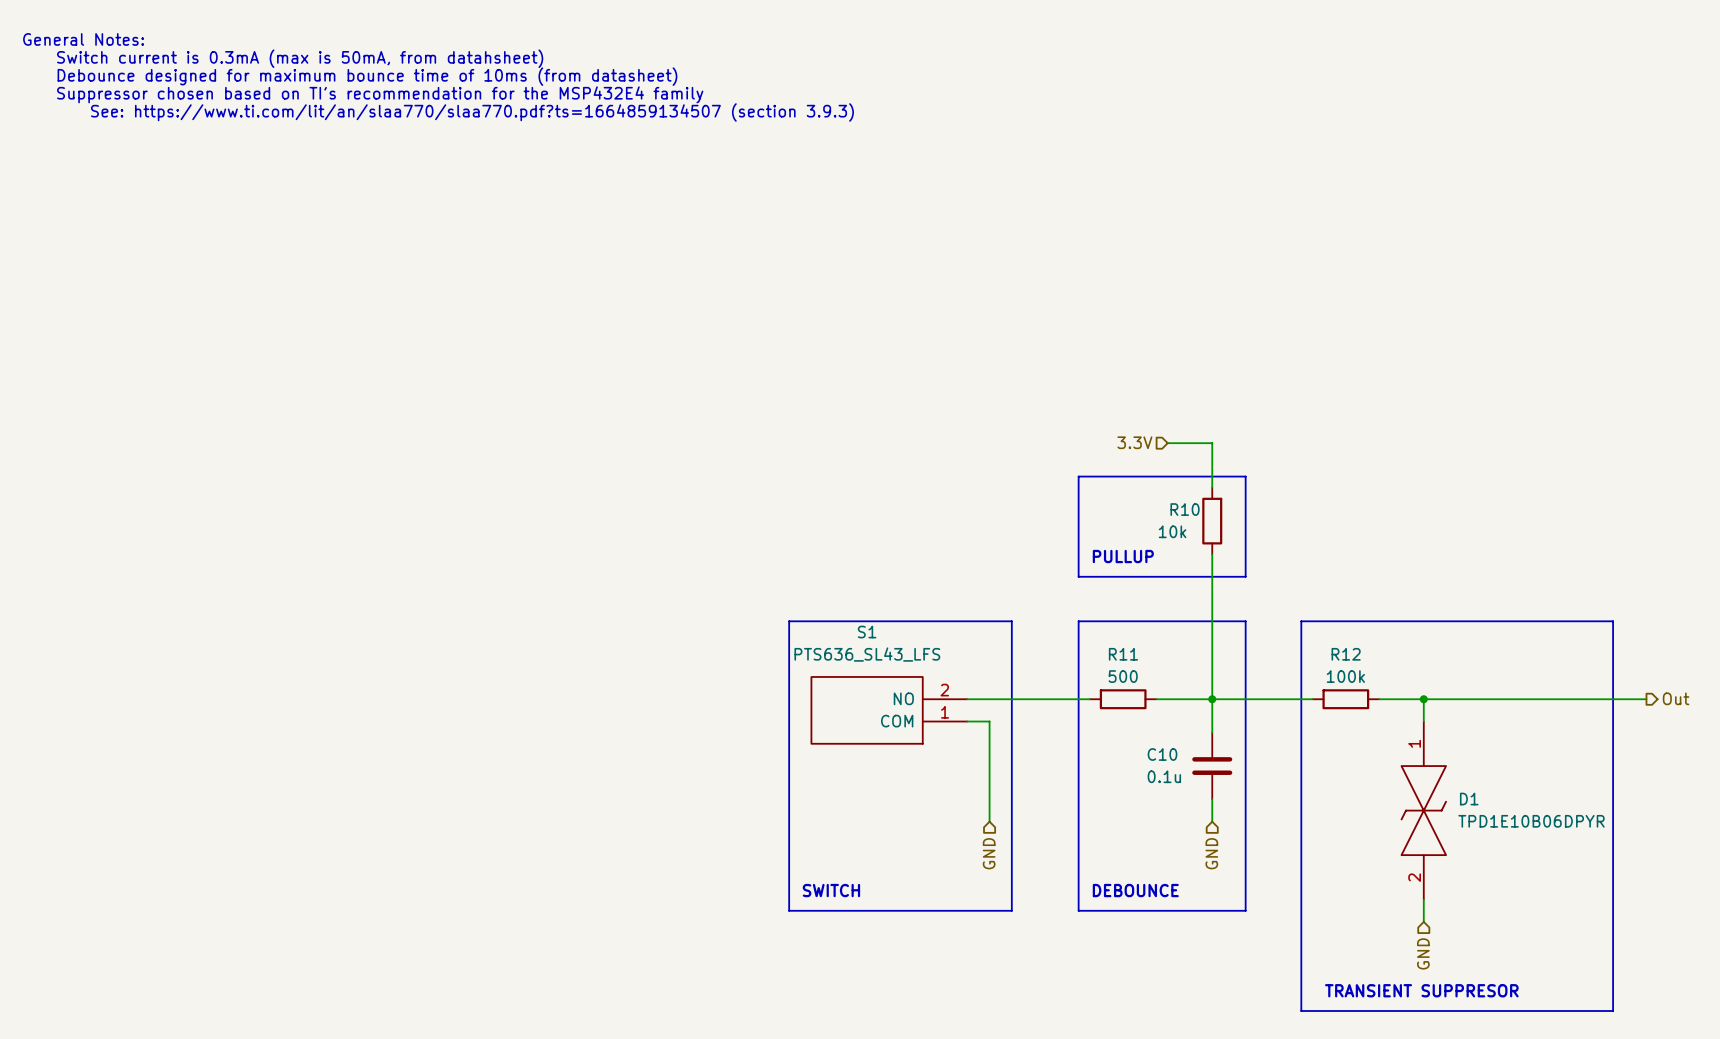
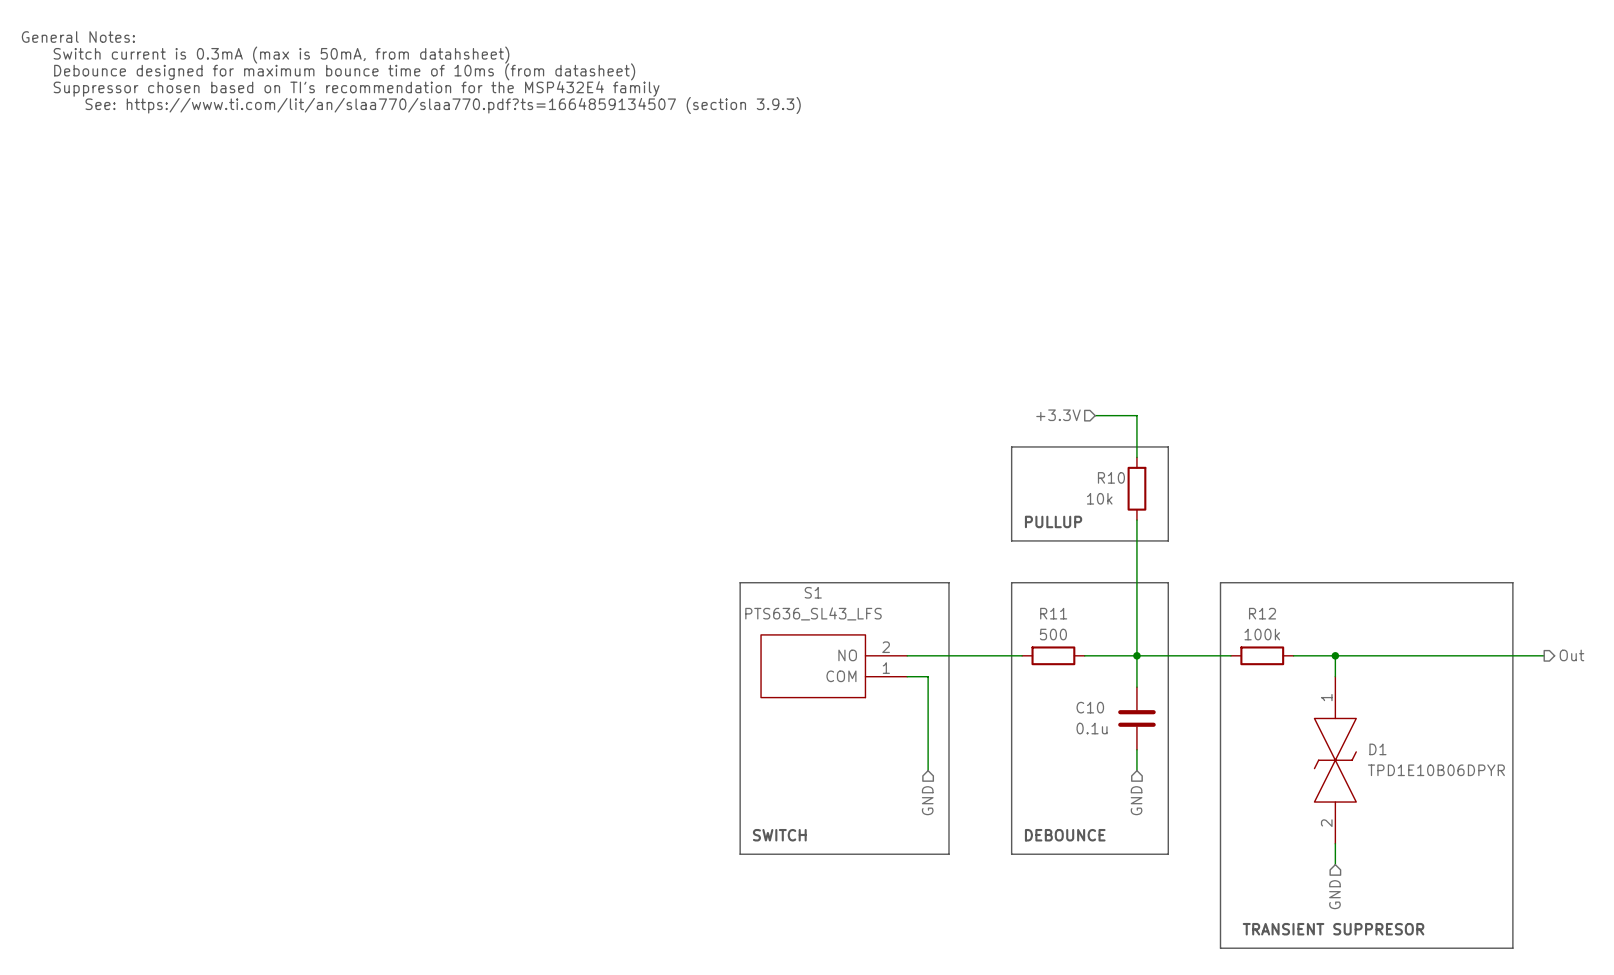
hierarchical label: 3.3V (1134, 442) -> +3.3V (1058, 415)

